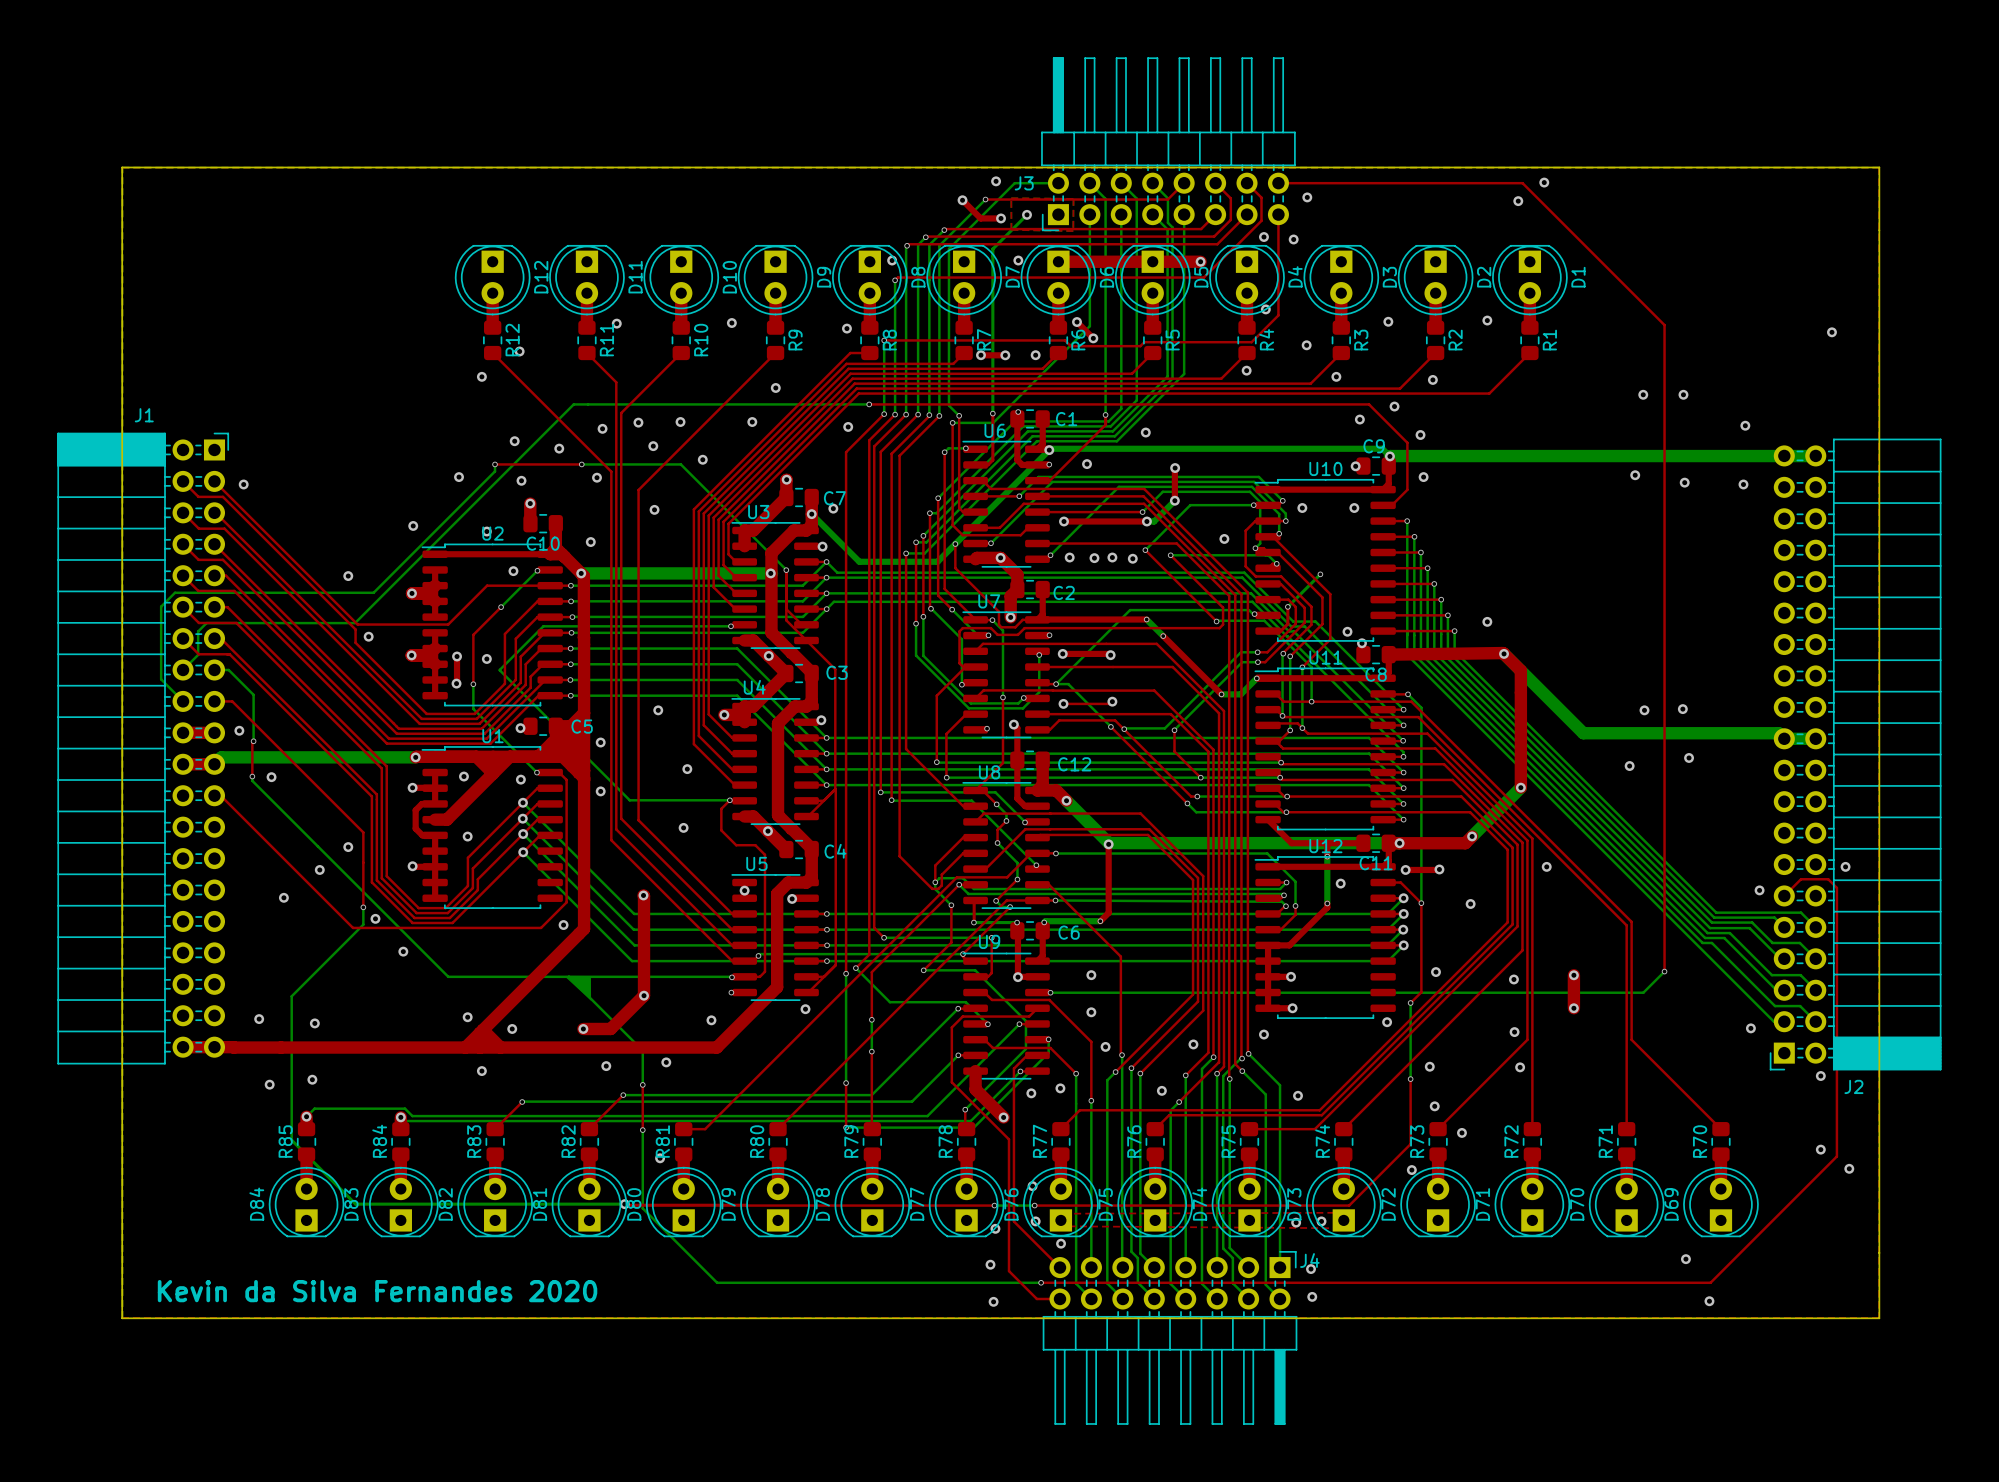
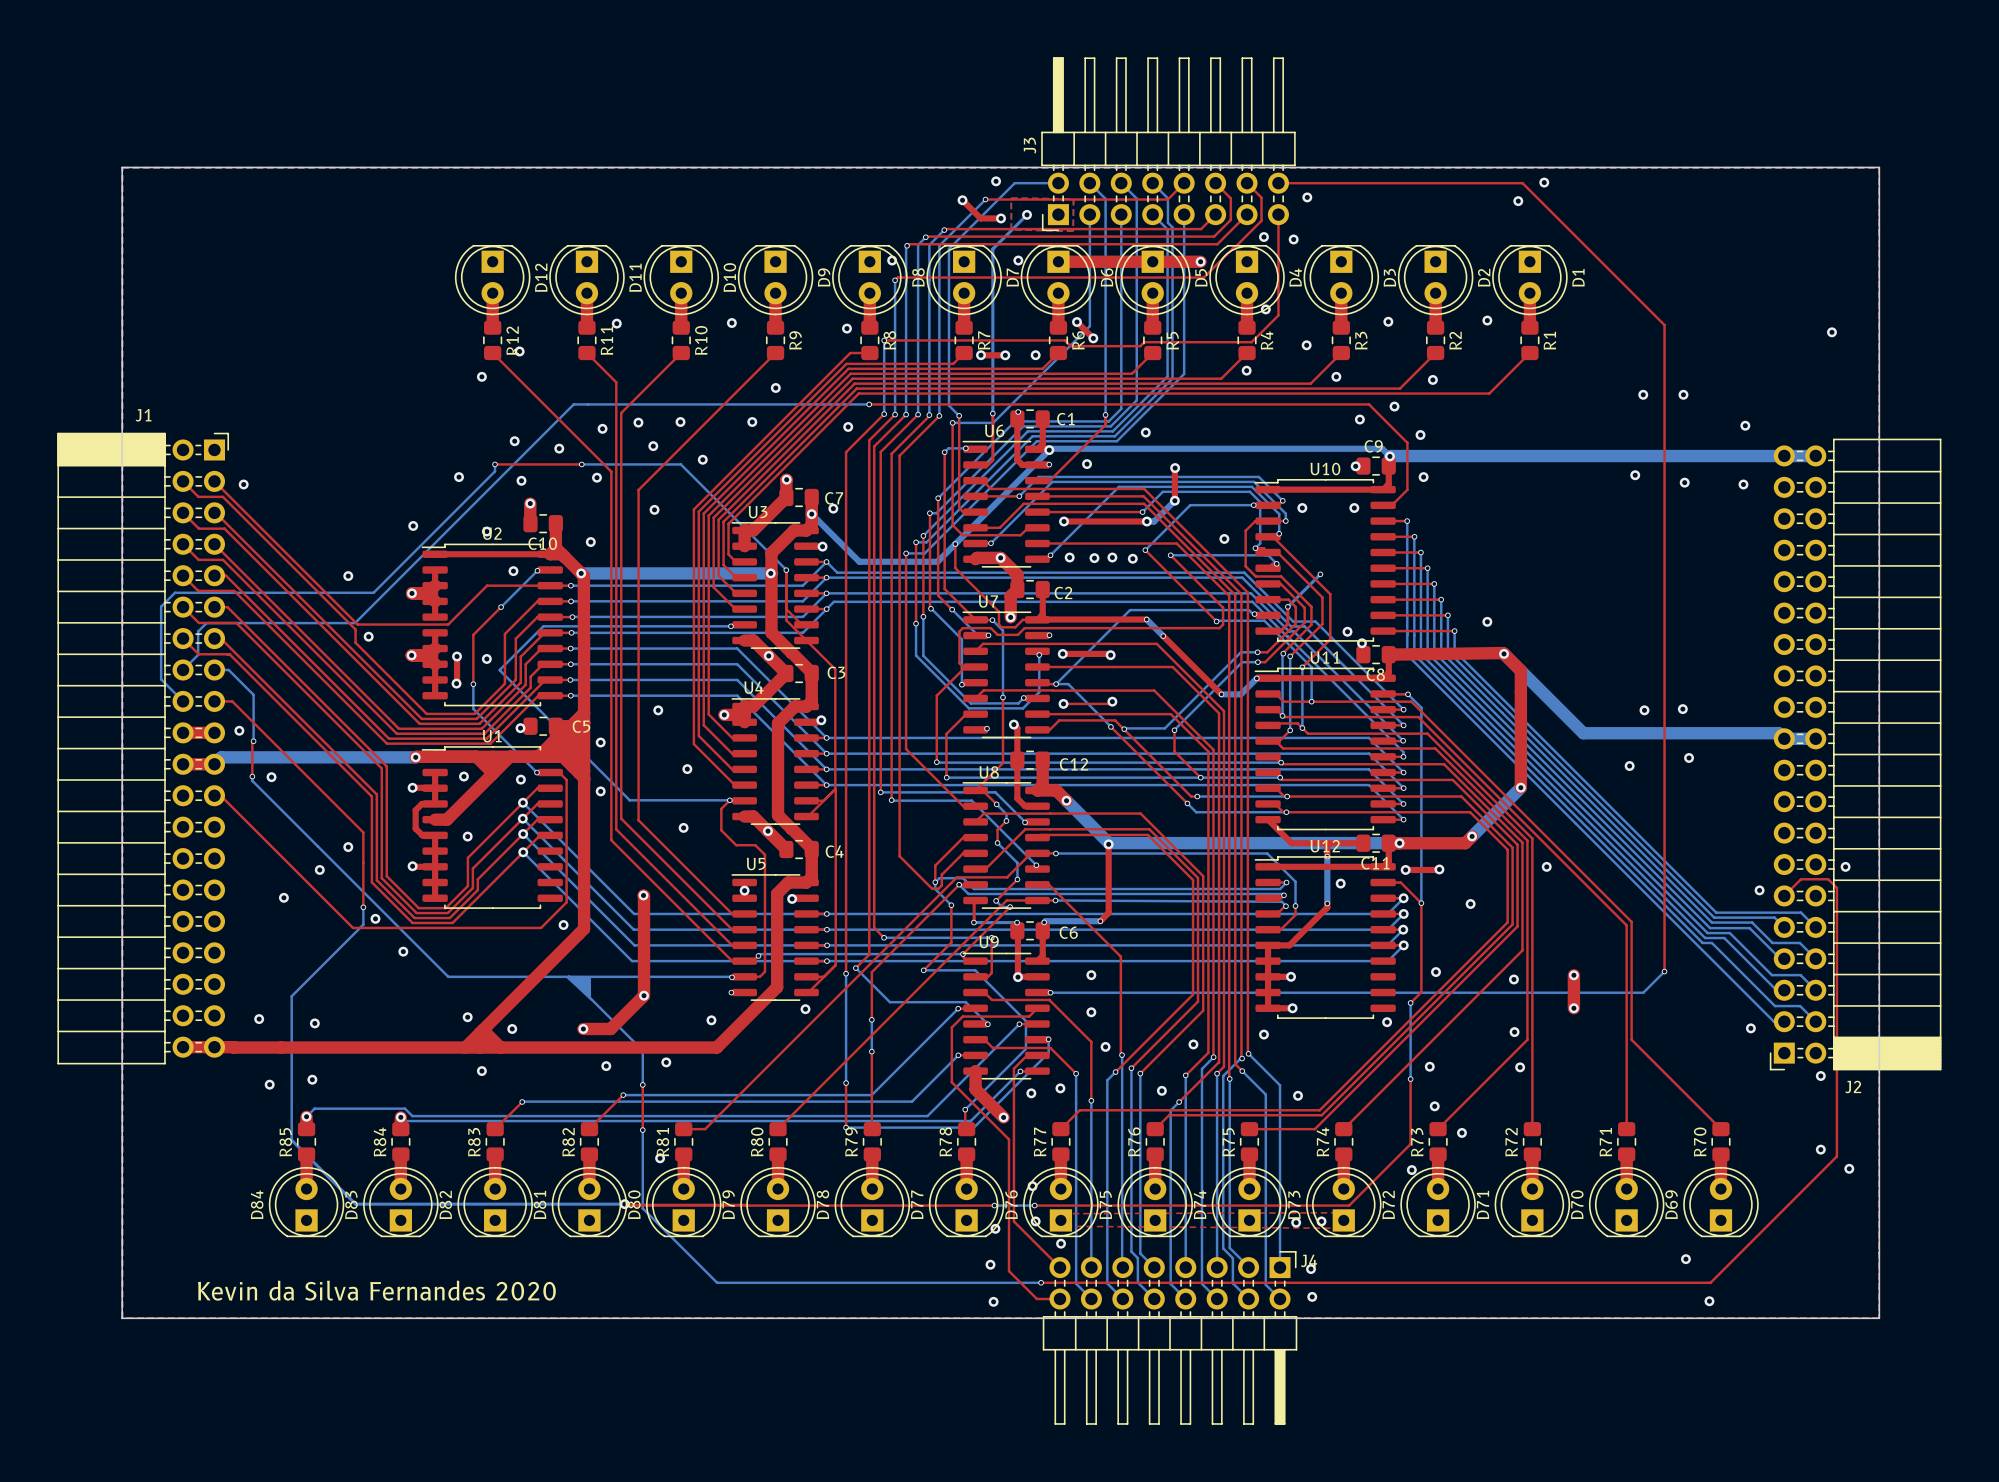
J3 name rotation: 0° (1024, 183) -> 90° counterclockwise (1029, 145)
J3 name position: J3 (1024, 183) -> J3 (1029, 145)

